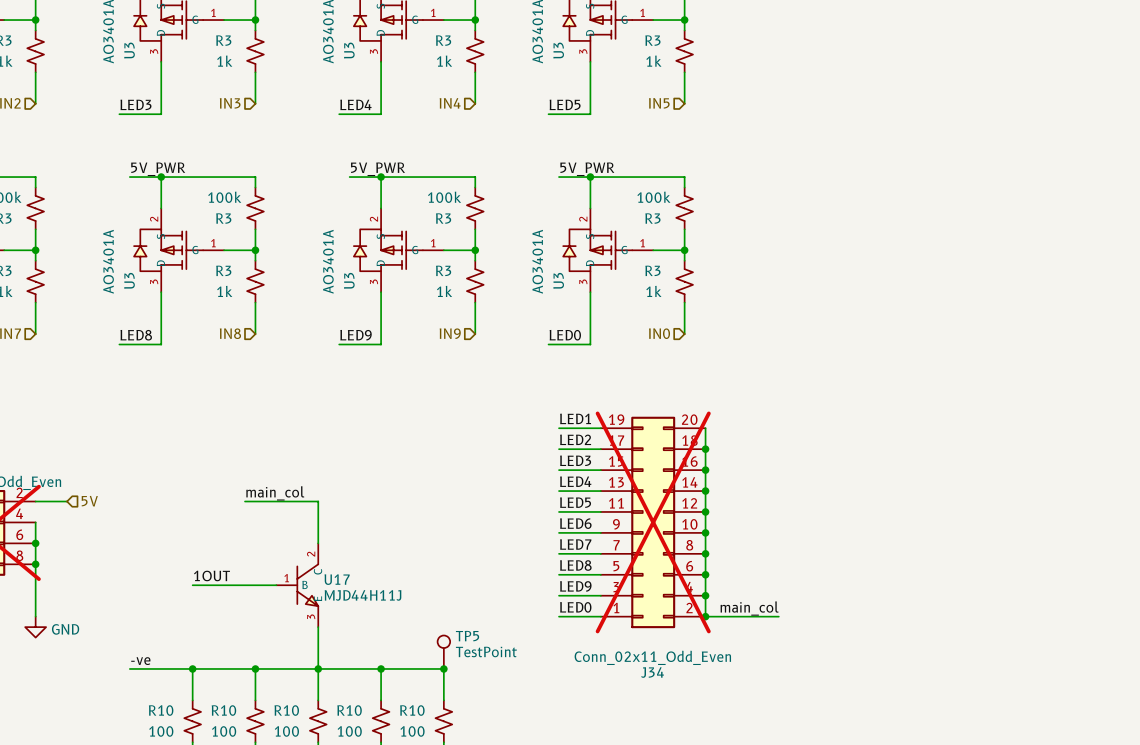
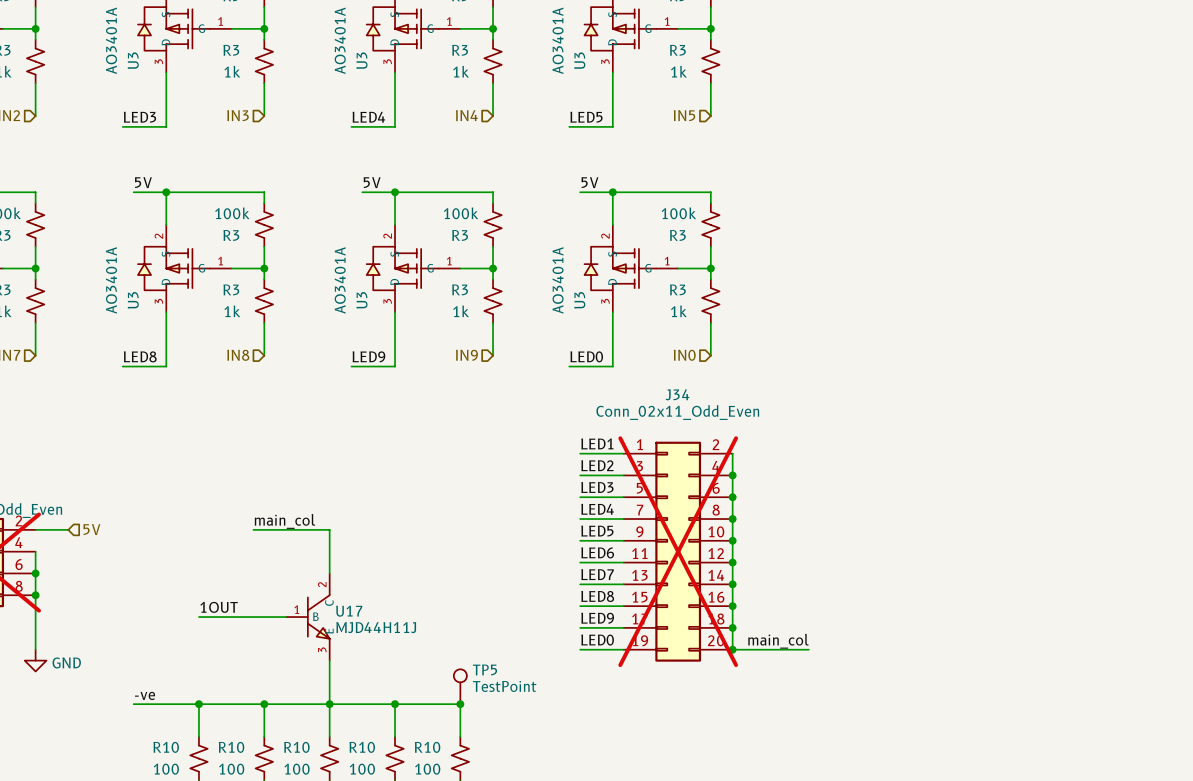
label: 5V_PWR (158, 169) -> 5V (143, 182)
label: 5V_PWR (378, 169) -> 5V (372, 182)
label: 5V_PWR (587, 169) -> 5V (589, 182)
J34 flip: as is (653, 522) -> up-down (678, 551)

